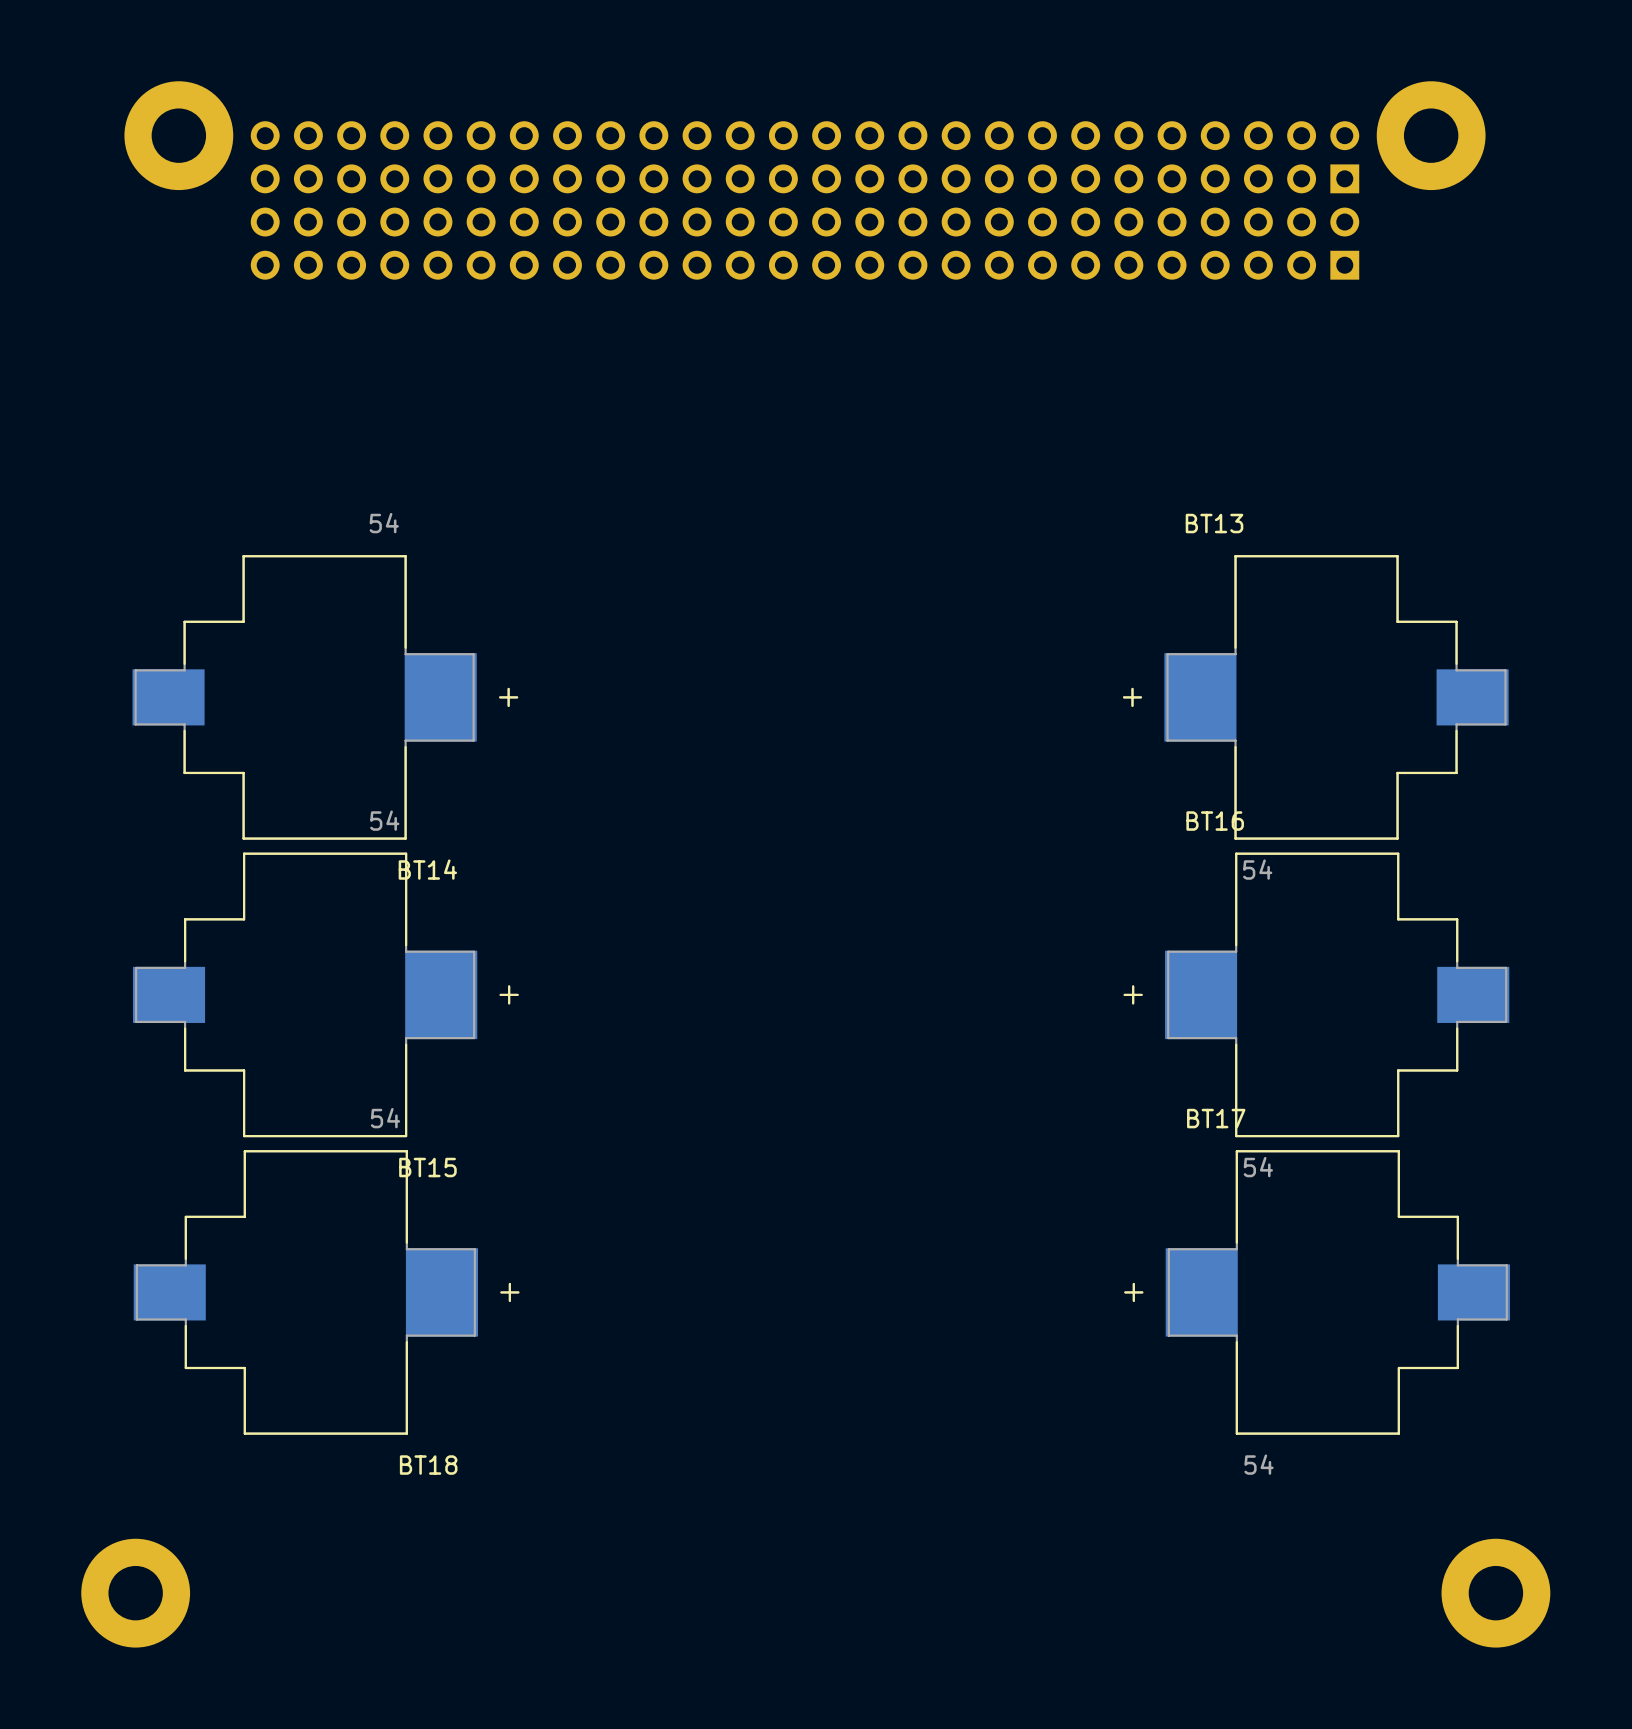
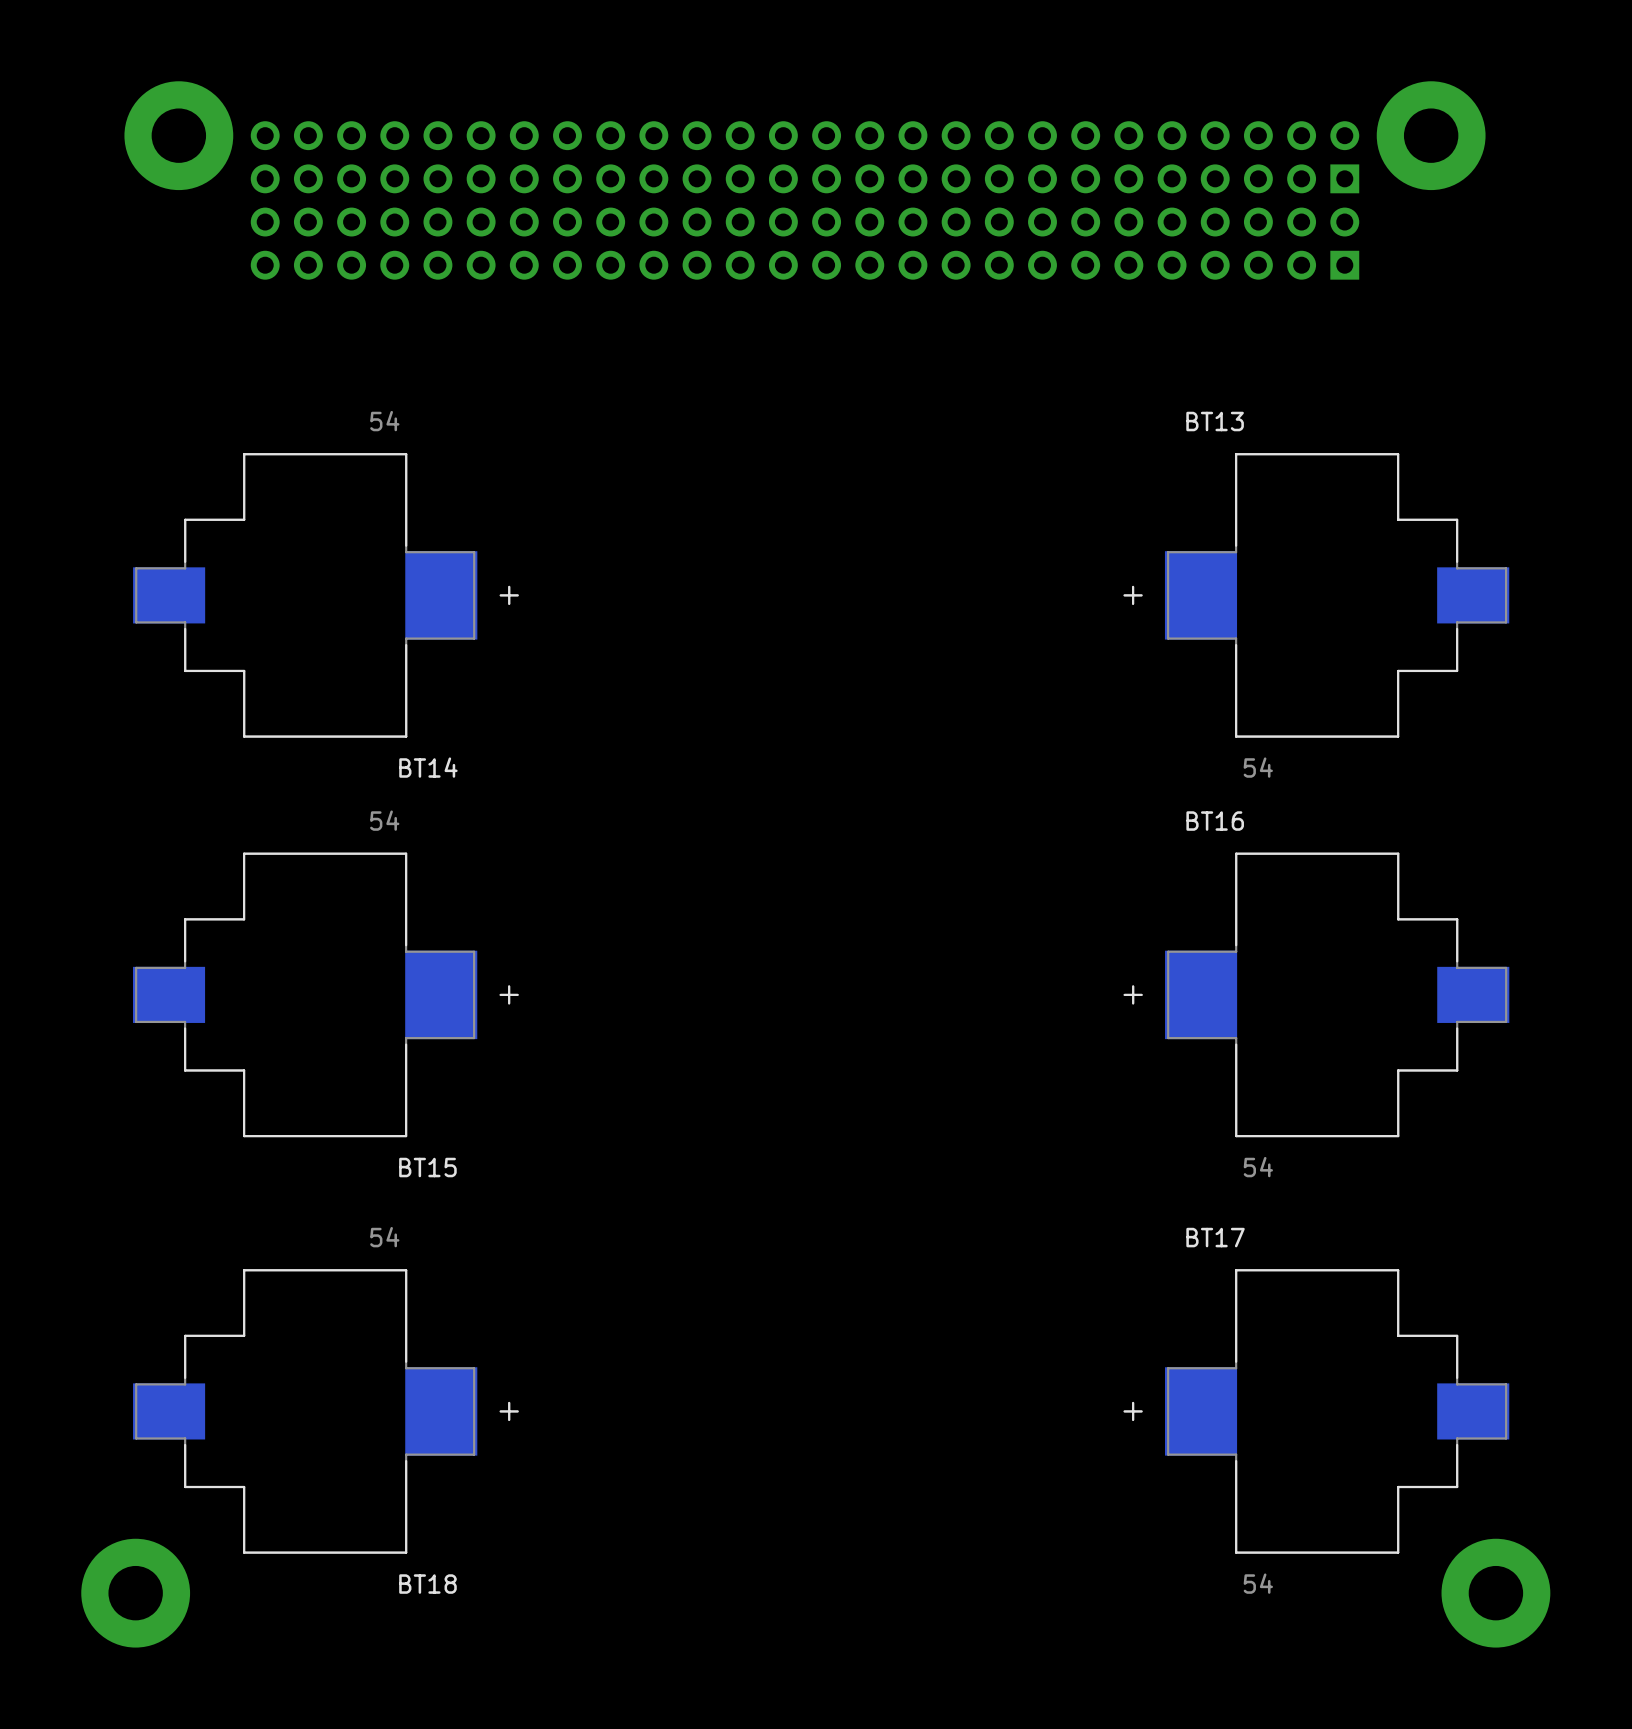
BT14 position: (325, 697) -> (325, 595)
BT13 position: (1315, 697) -> (1316, 595)
BT18 position: (326, 1292) -> (325, 1411)
BT17 position: (1317, 1292) -> (1316, 1411)

